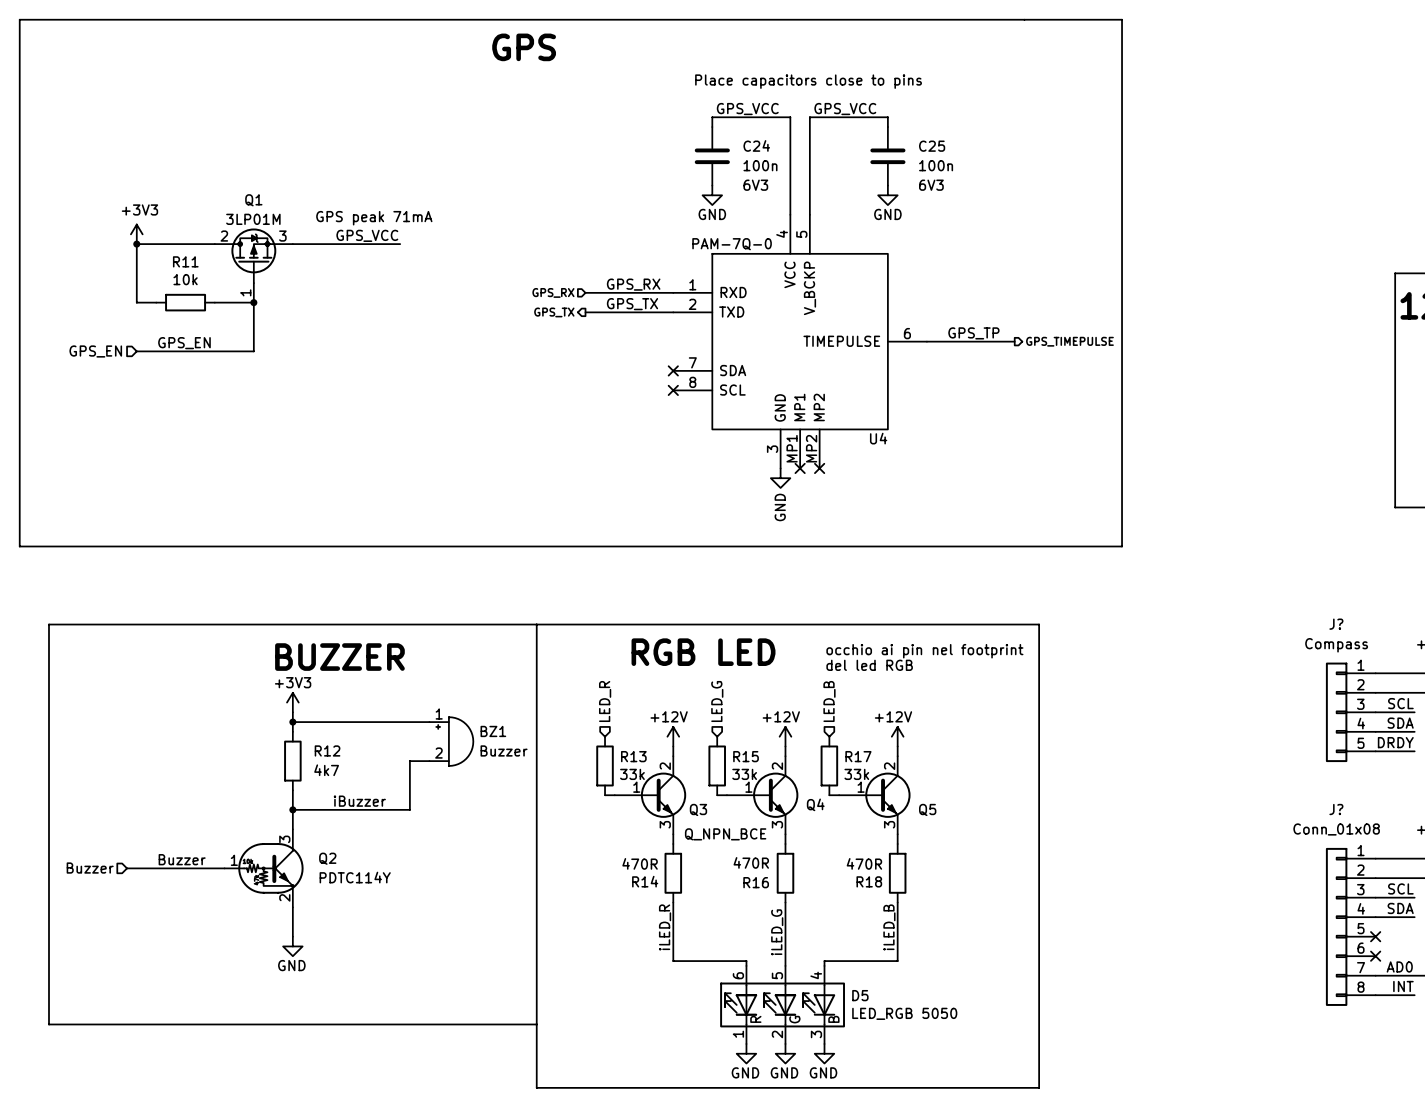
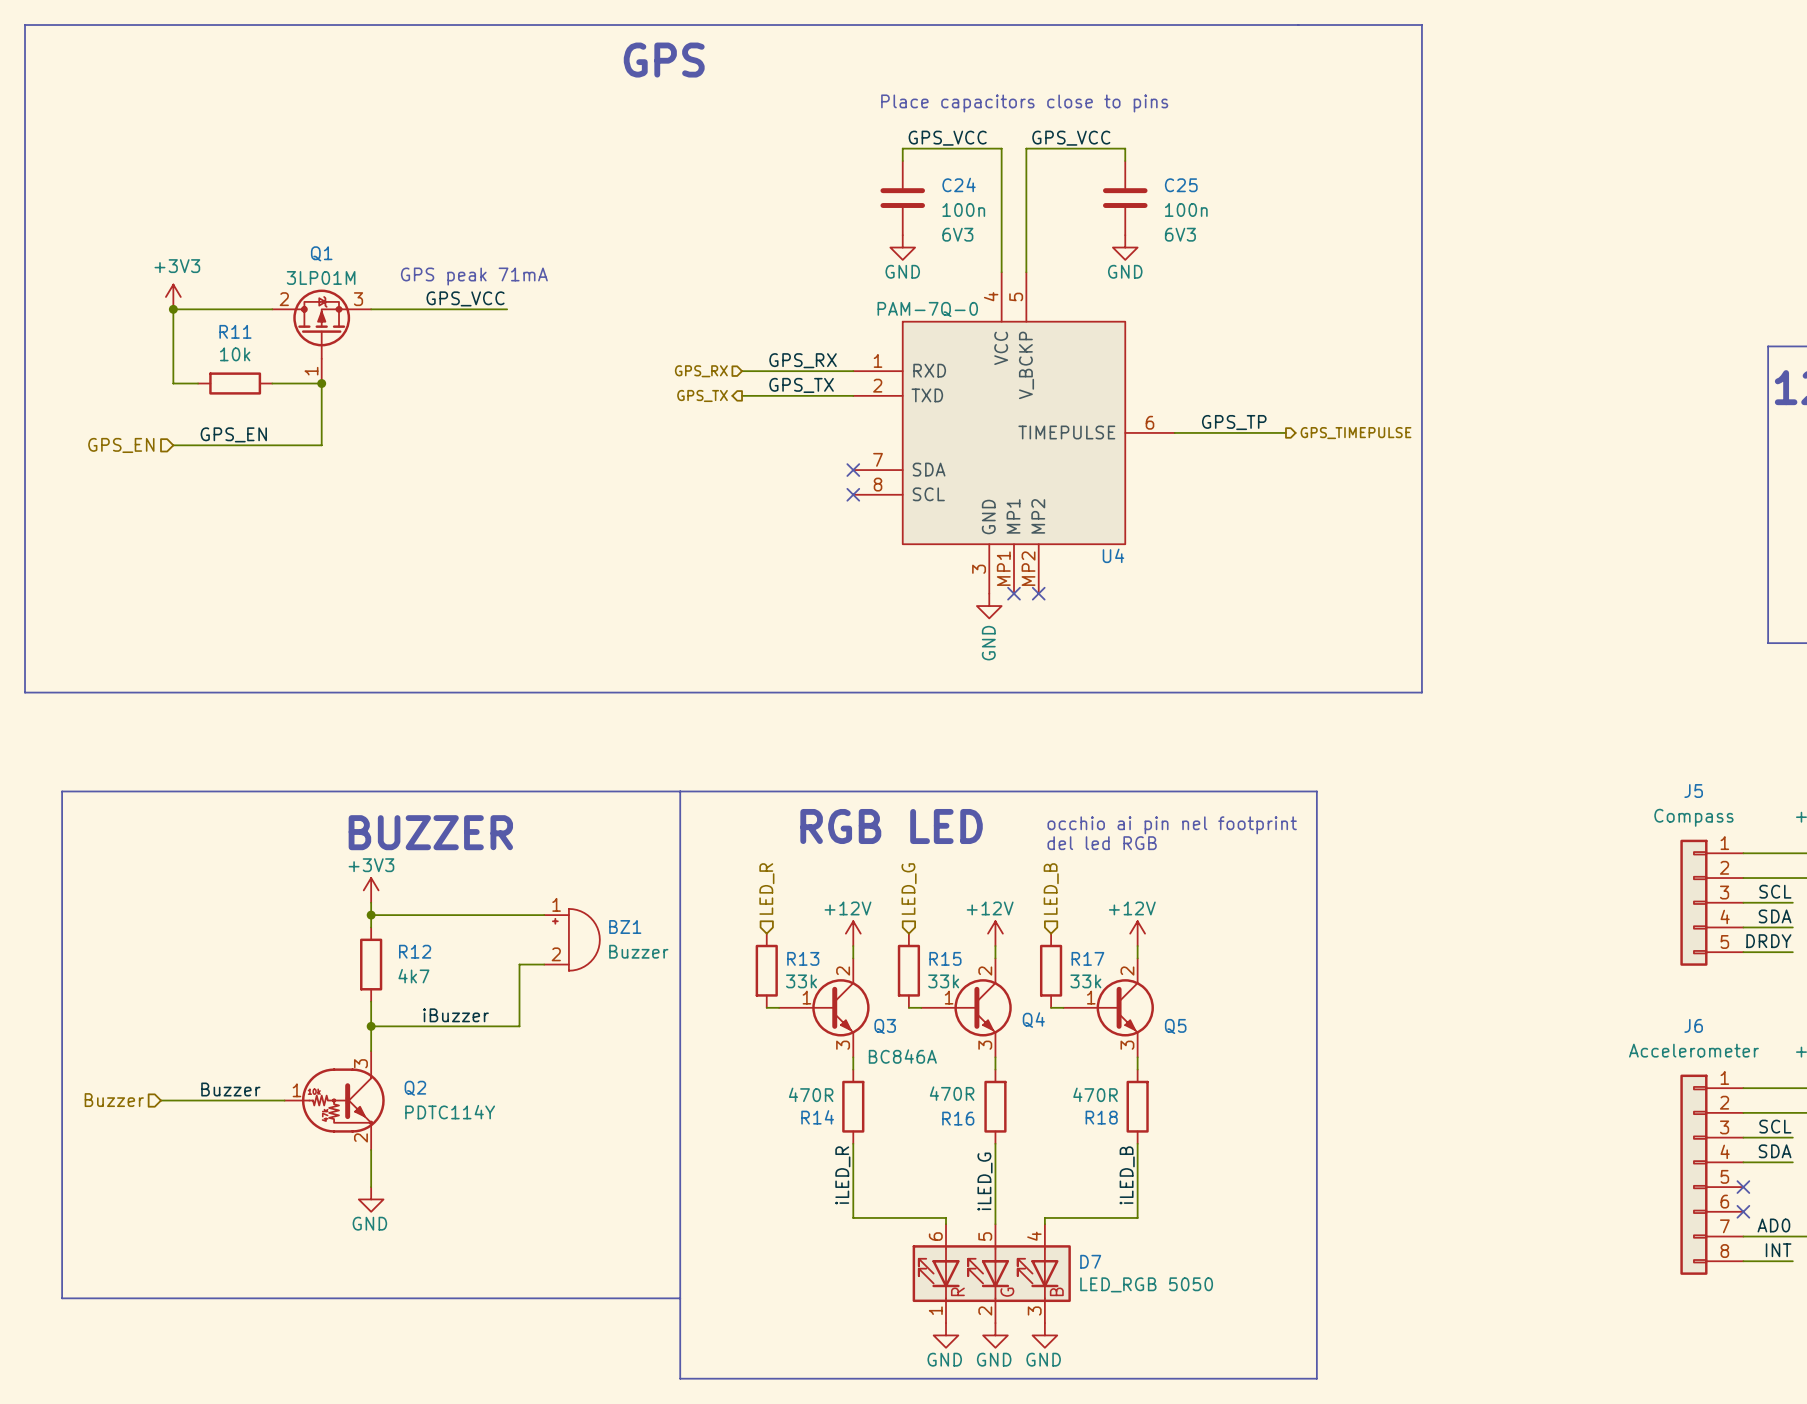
J? name: J? (1336, 624) -> J5 (1693, 791)
J? name: J? (1336, 809) -> J6 (1693, 1025)
J? value: Conn_01x08 (1336, 829) -> Accelerometer (1693, 1050)
Q3 value: Q_NPN_BCE (725, 834) -> BC846A (902, 1056)
D5 name: D5 (860, 995) -> D7 (1090, 1261)

